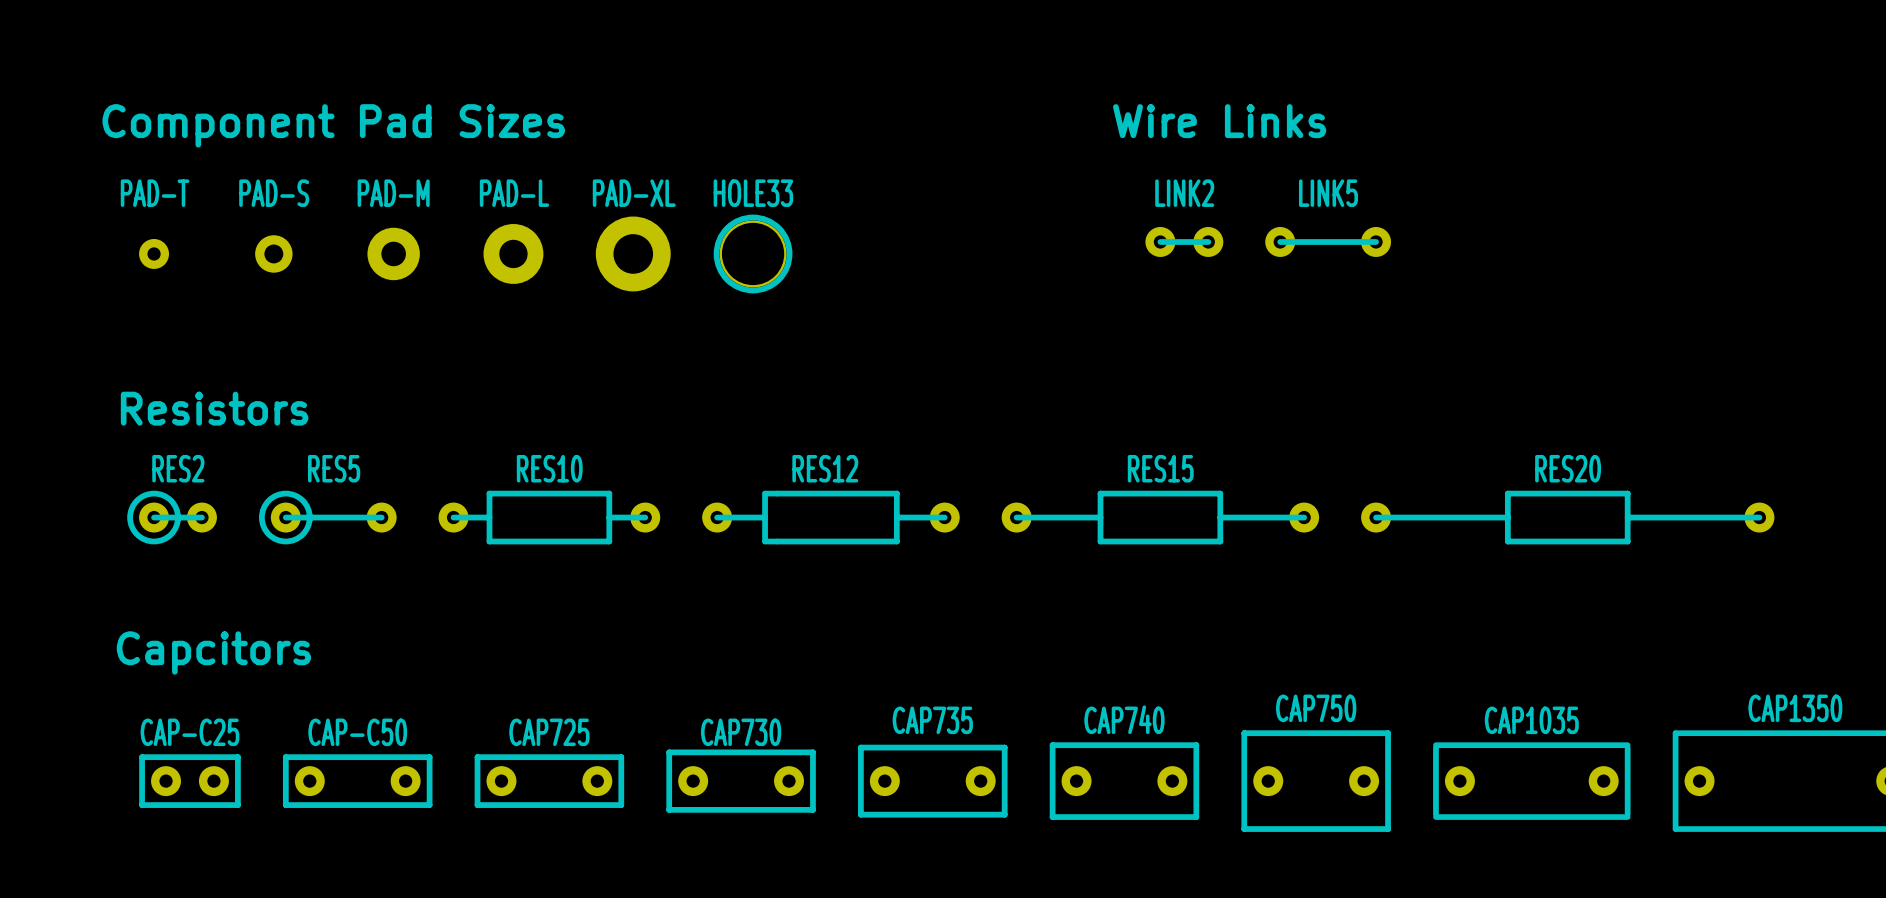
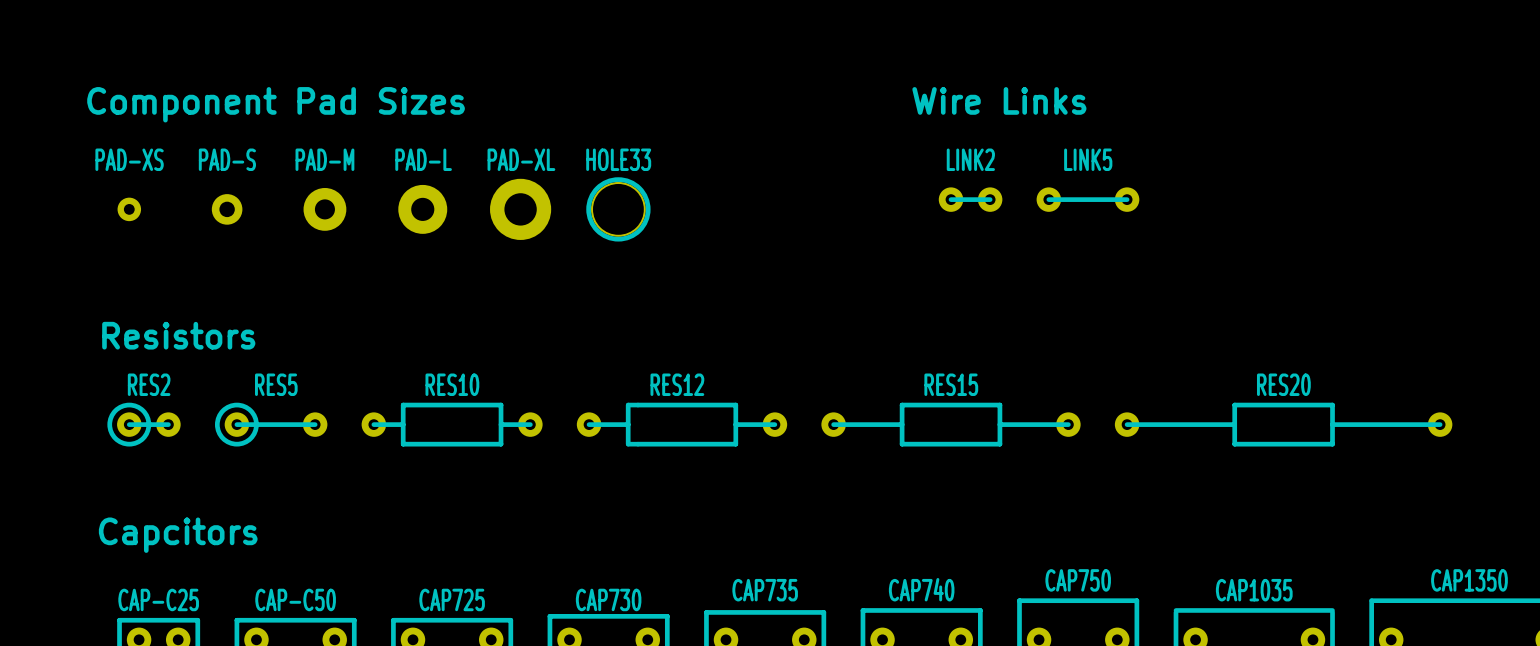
PAD-T: (154, 253) -> none
PAD-XS: none -> (129, 209)

